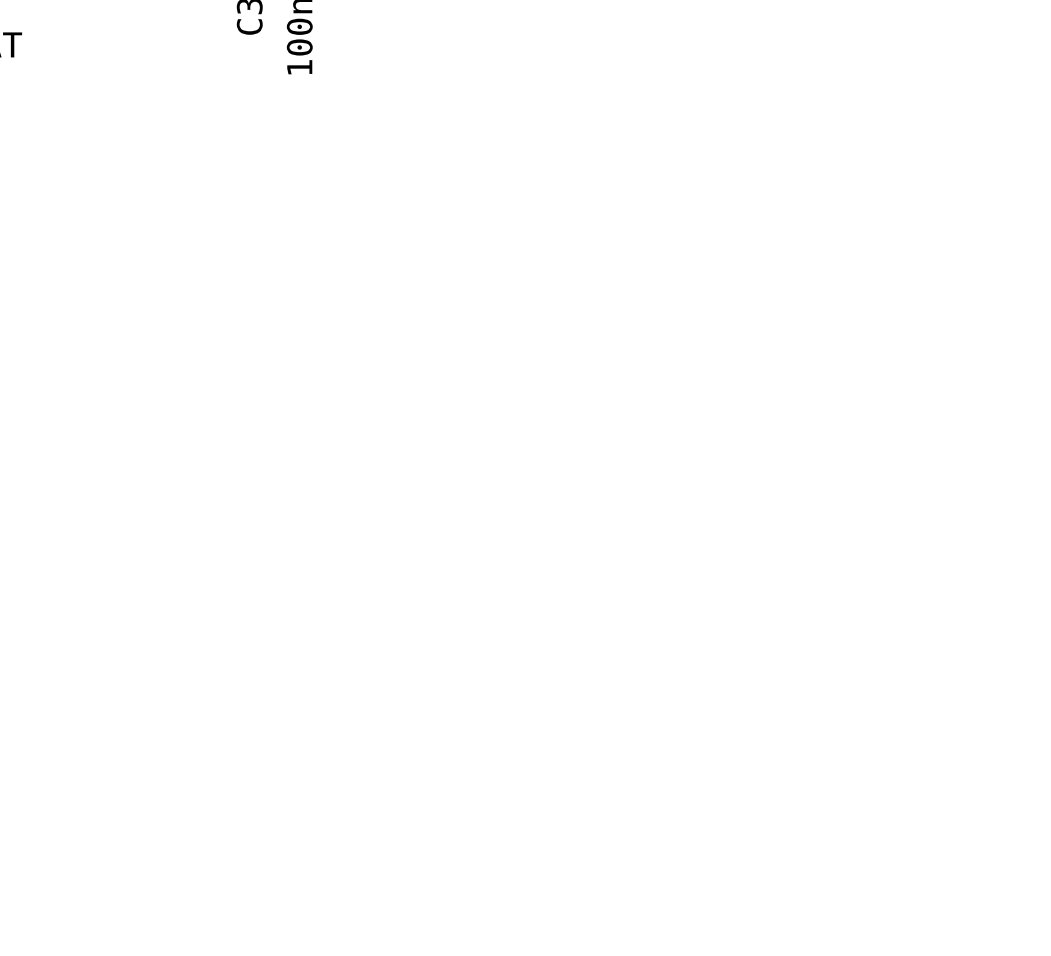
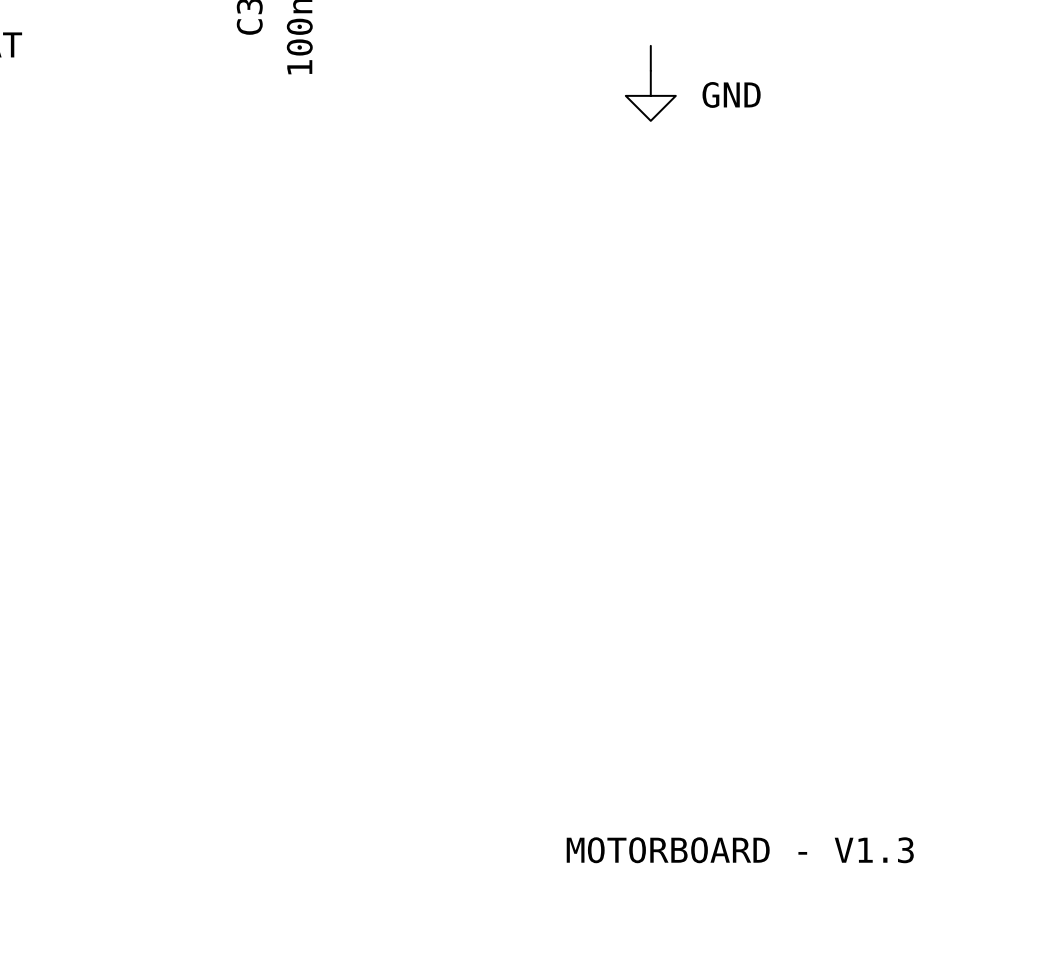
wire: none -> (650, 45) (650, 70)
power symbol: none -> GND (650, 95)
text: none -> MOTORBOARD - V1.3 (740, 850)

